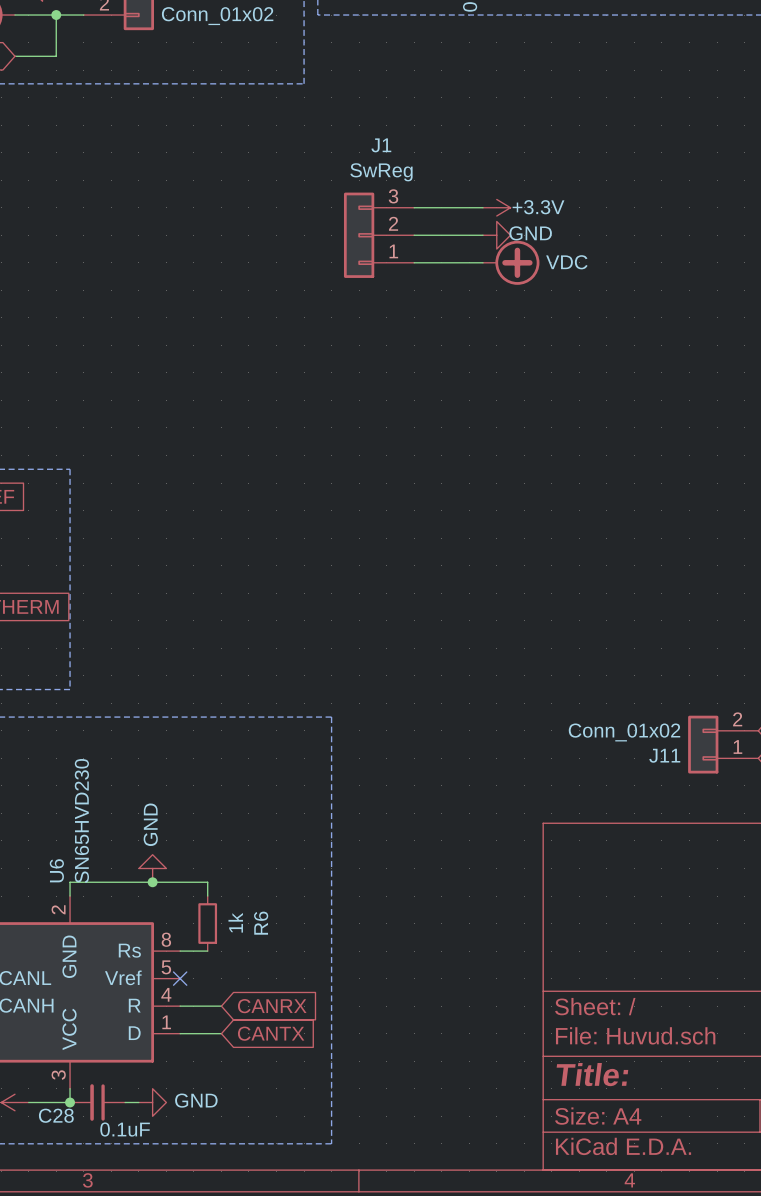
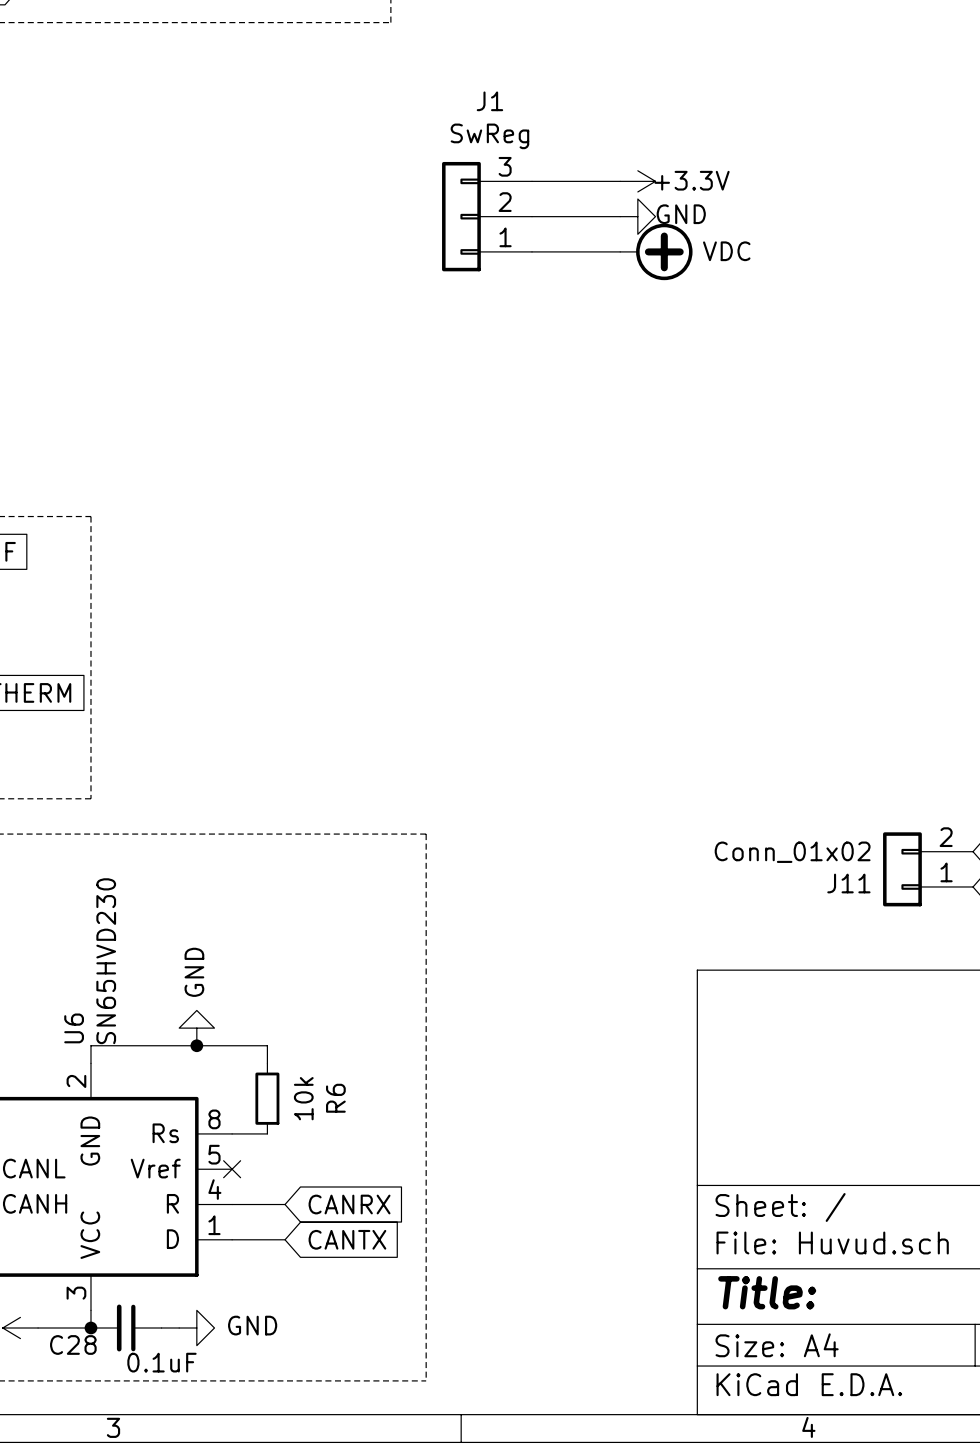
R6 value: 1k (235, 922) -> 10k (303, 1098)

